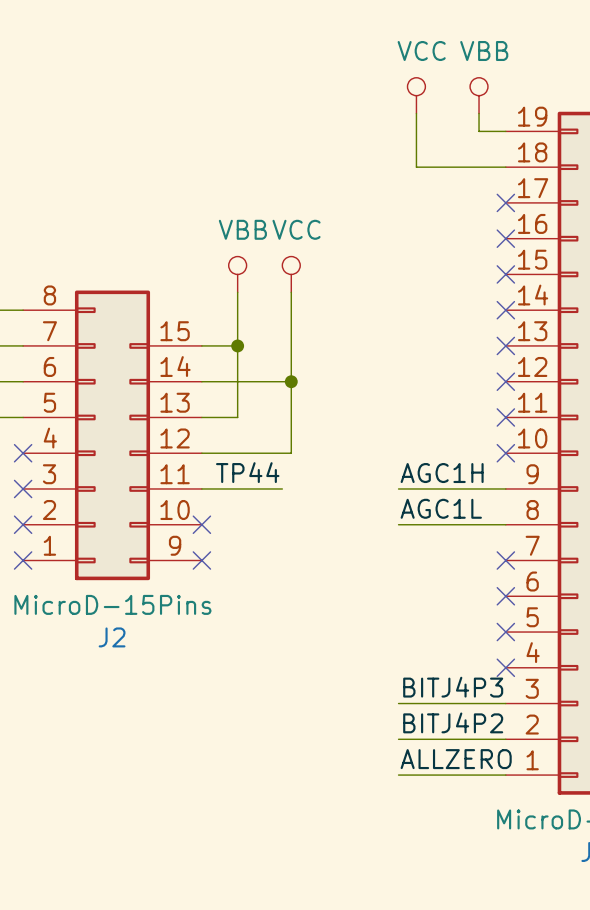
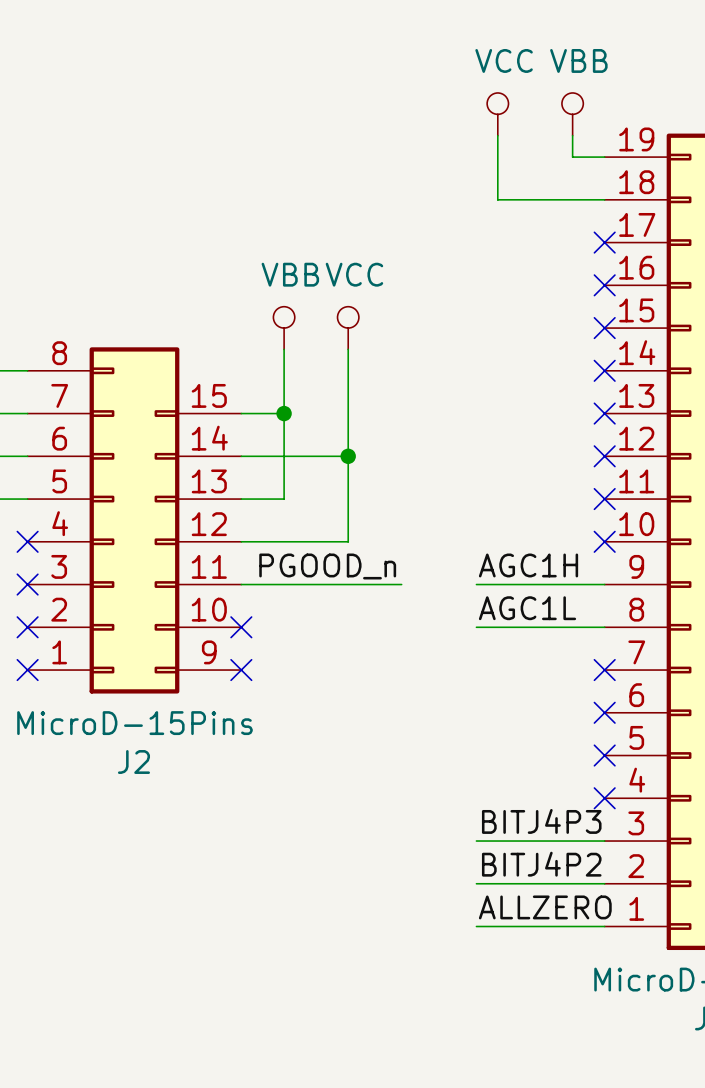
label: TP44 (247, 472) -> none
label: none -> PGOOD_n (327, 566)
wire: none -> (337, 584) (401, 584)

